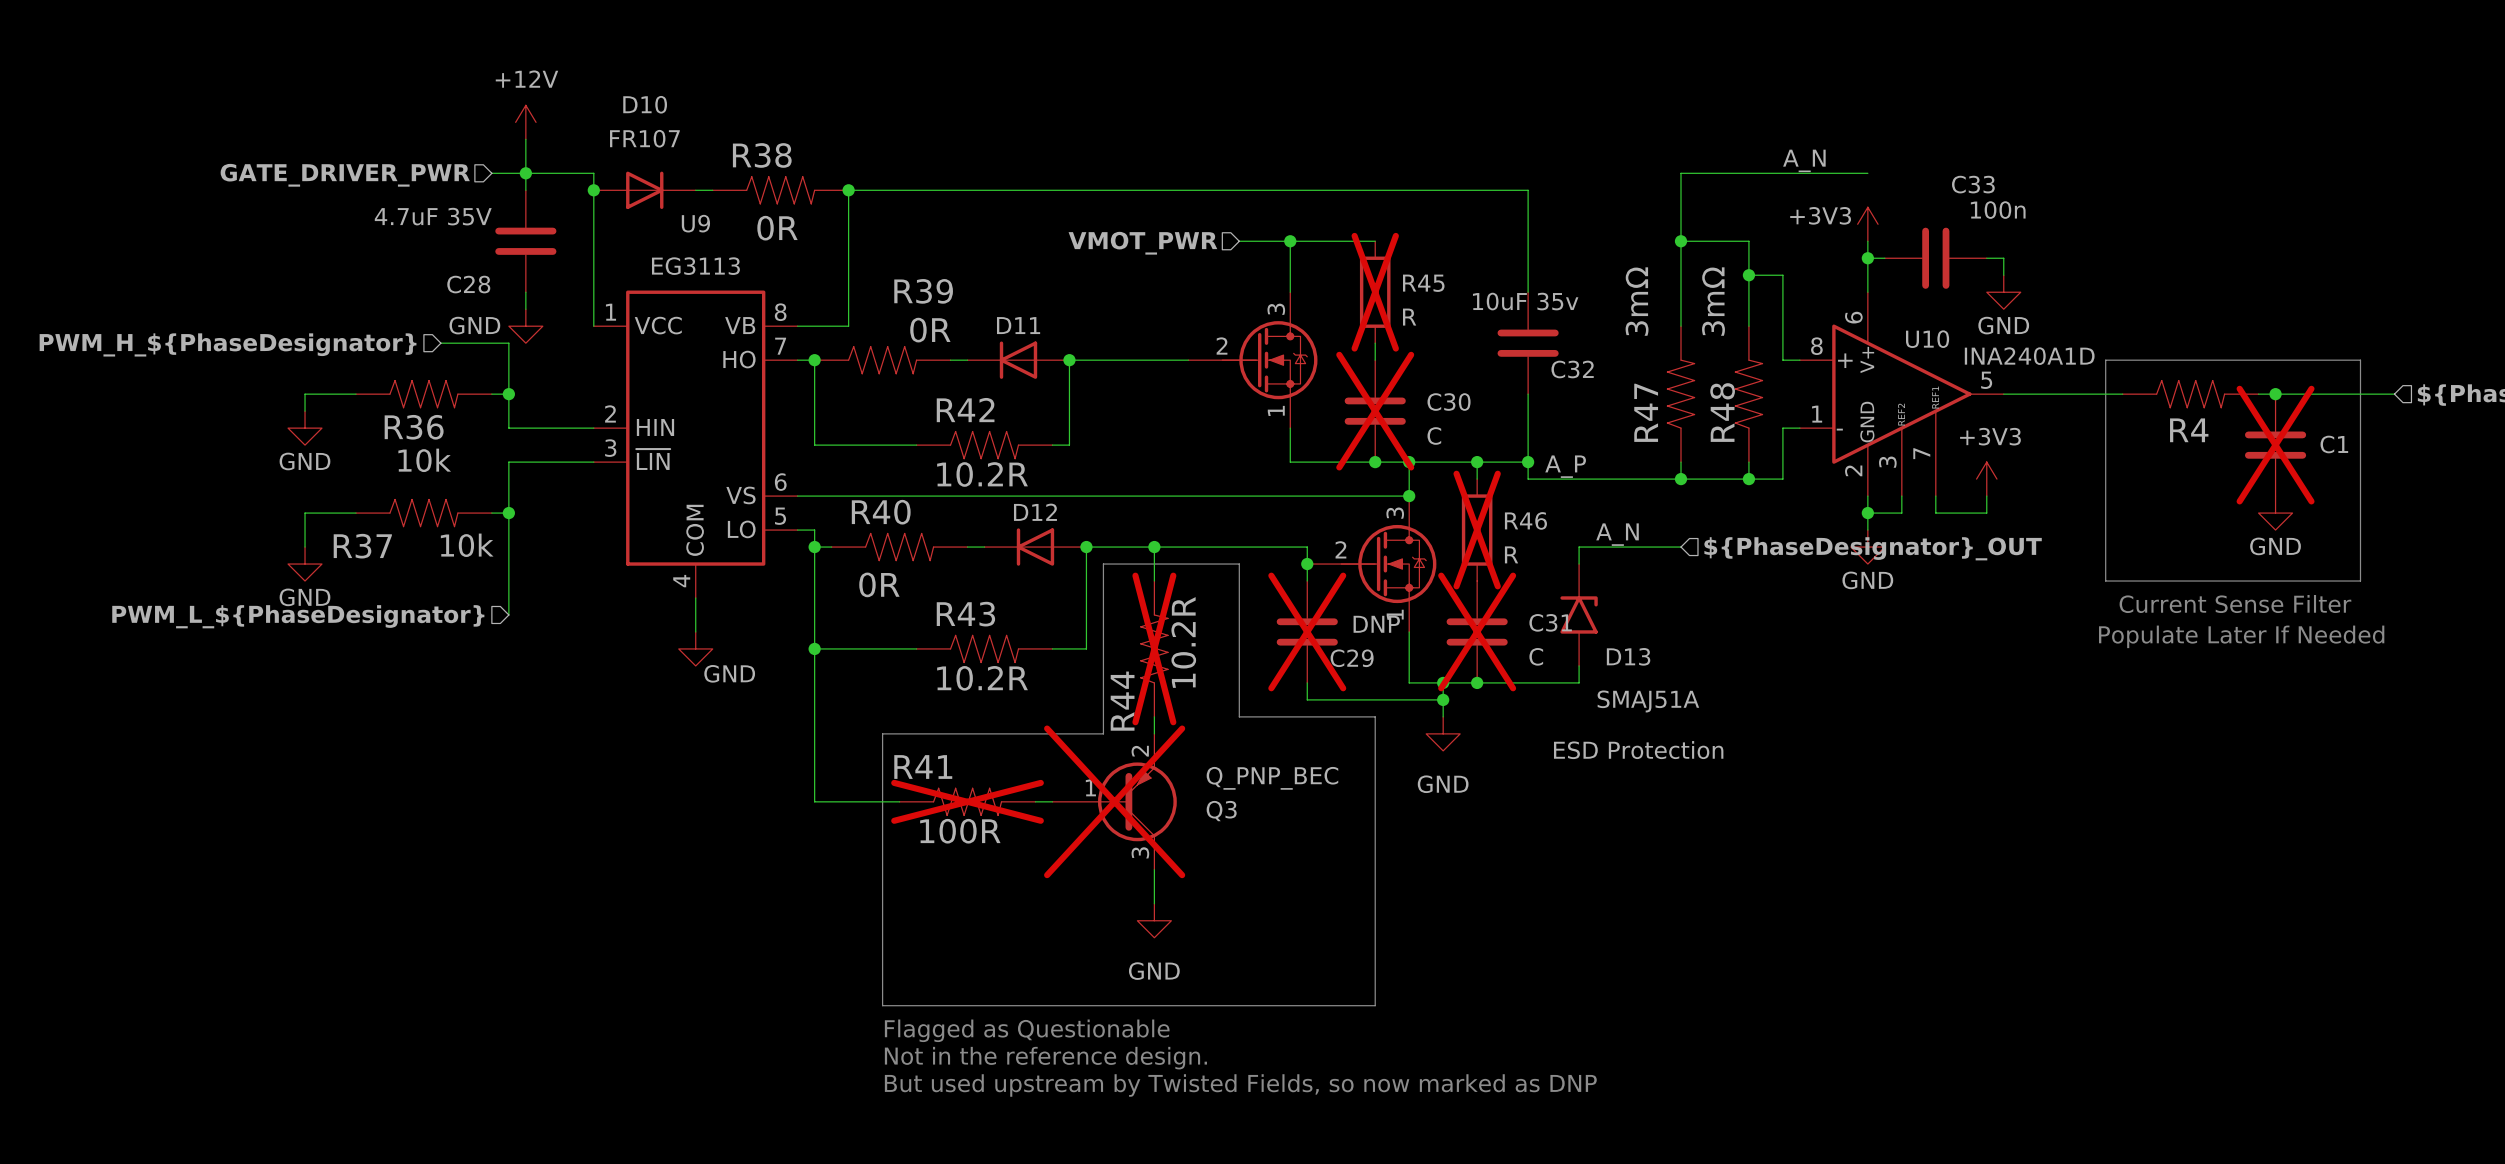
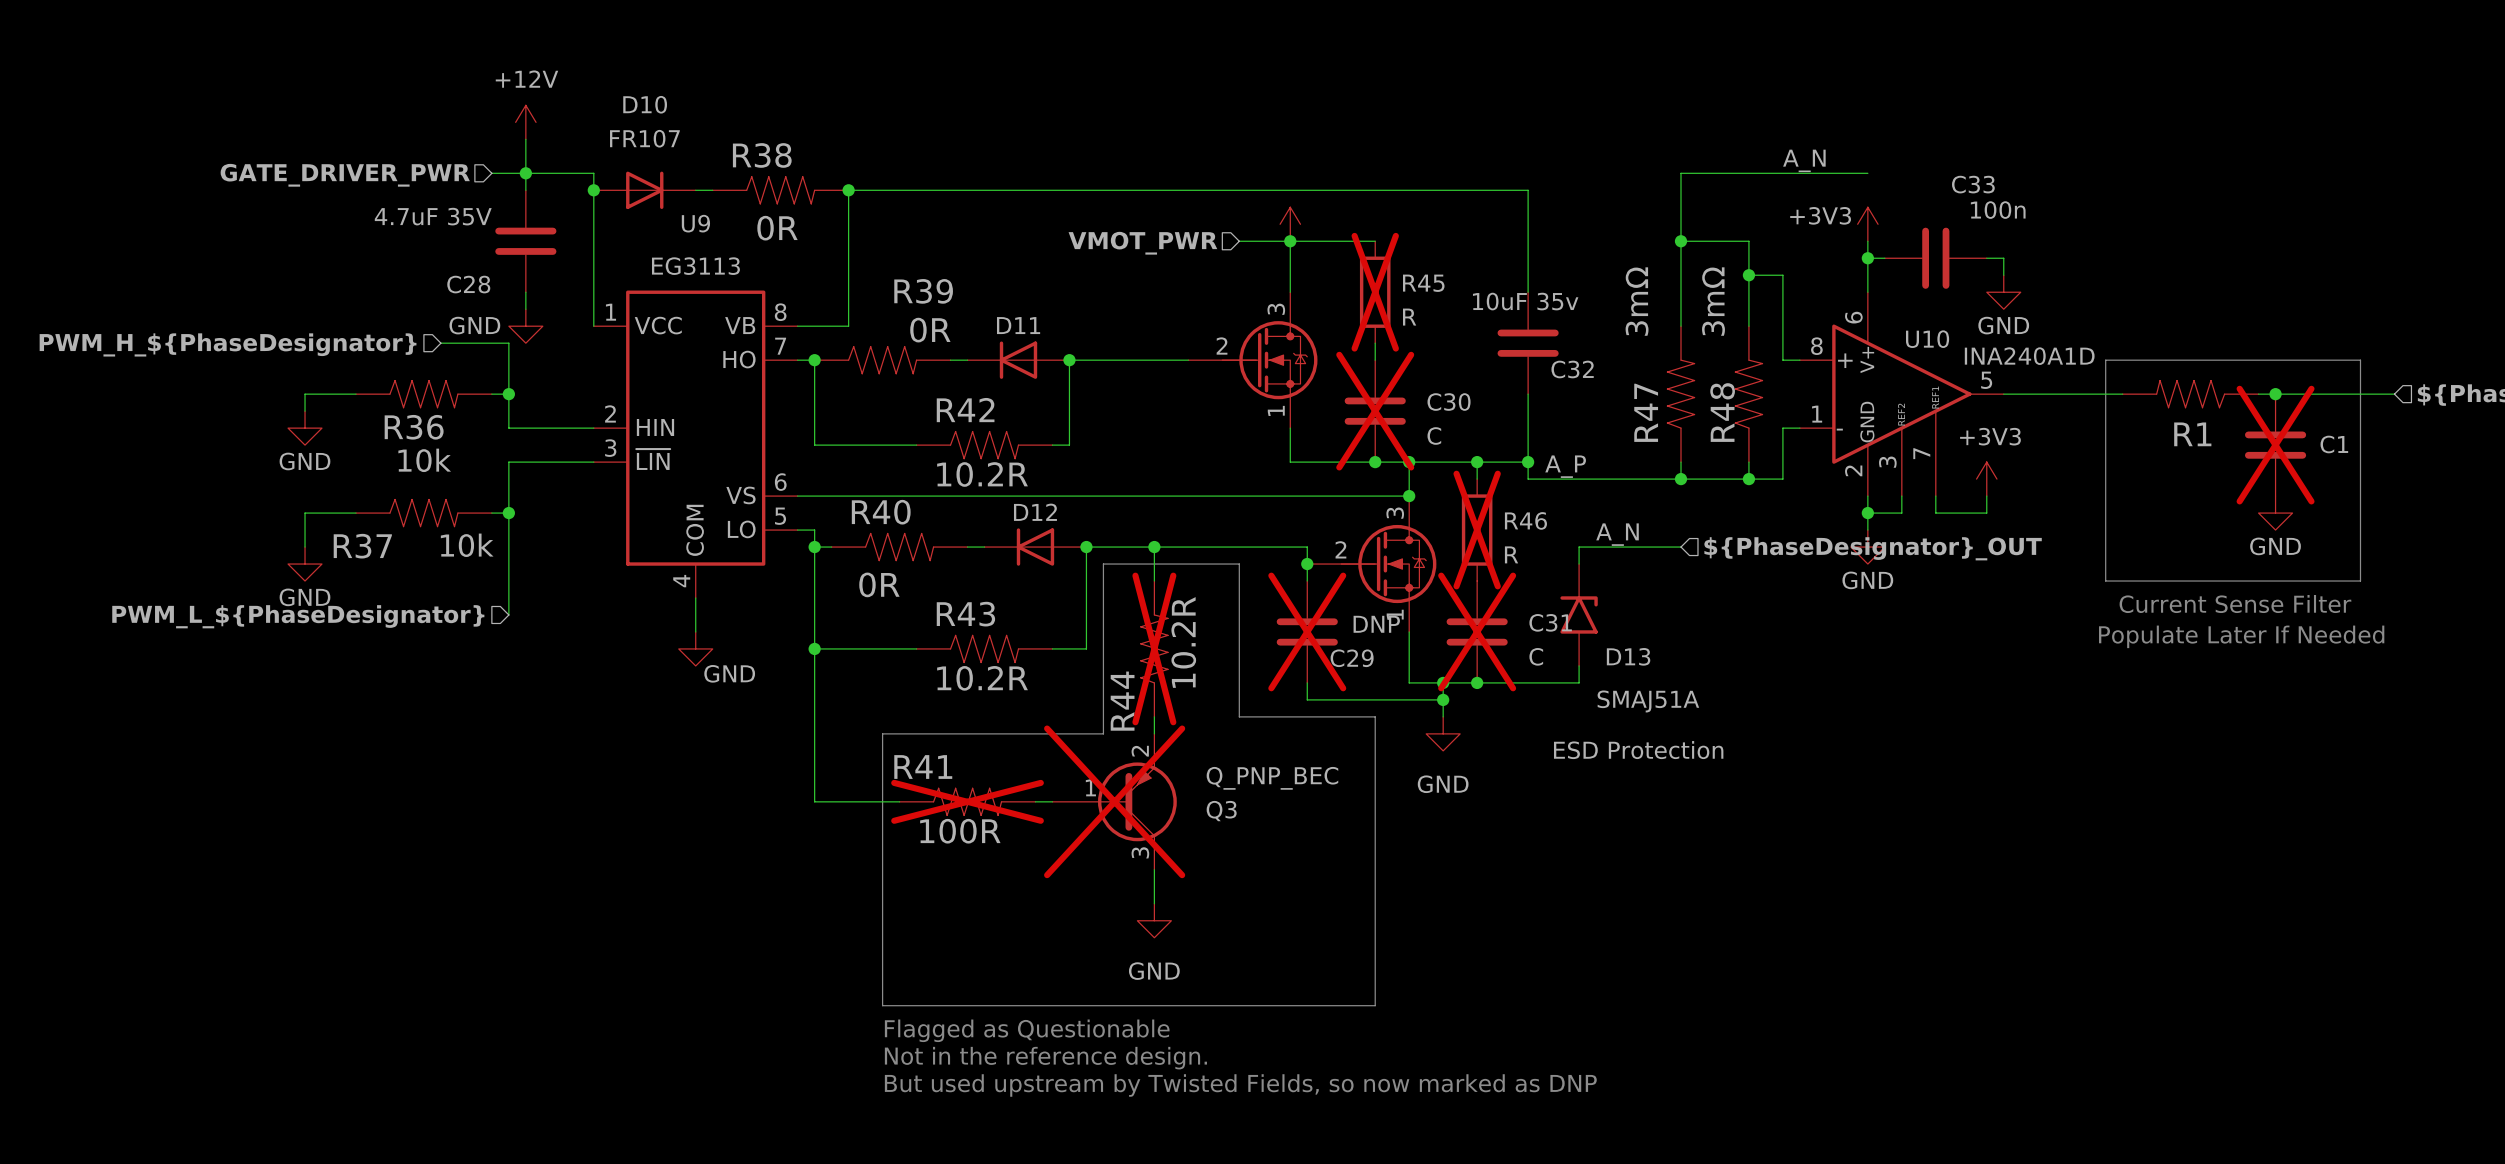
power symbol: none -> (1290, 224)
R4: (2190, 394) -> none
R1: none -> (2190, 394)

